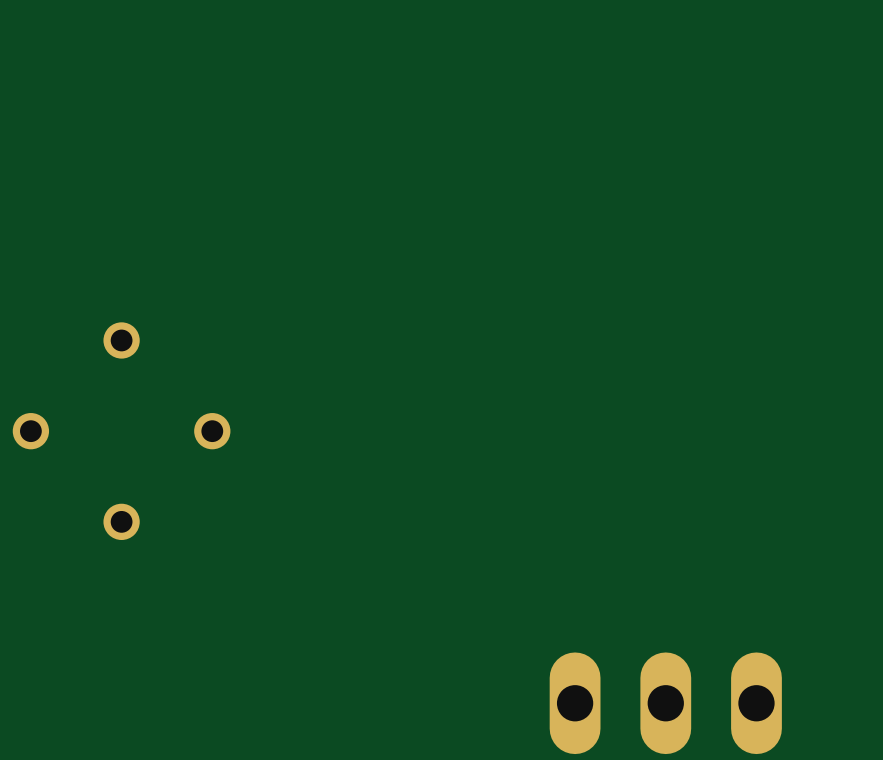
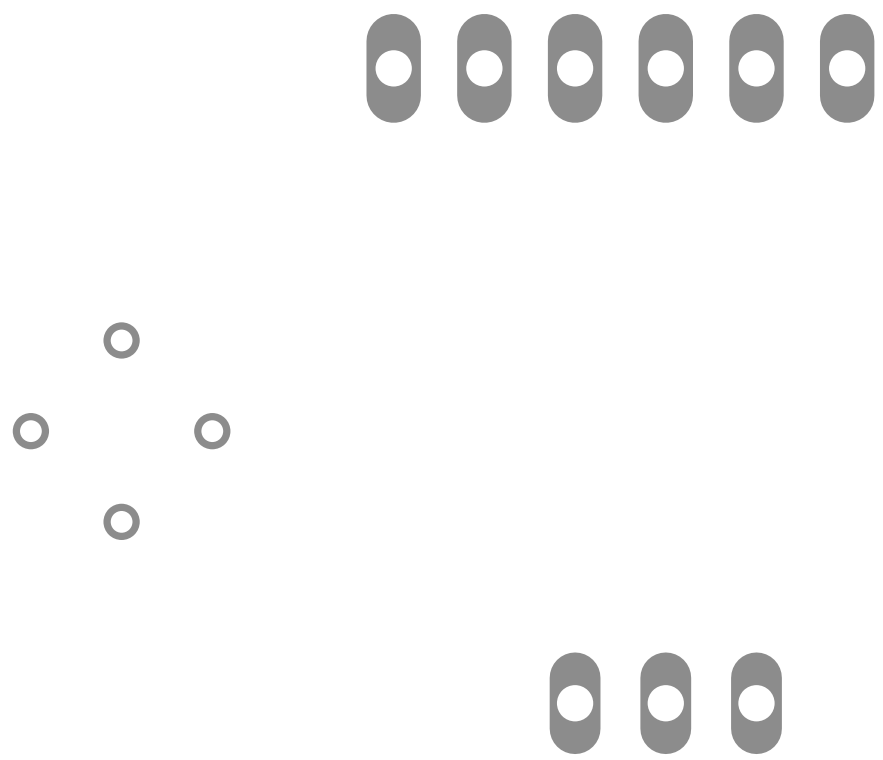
part: none -> (620, 68)

